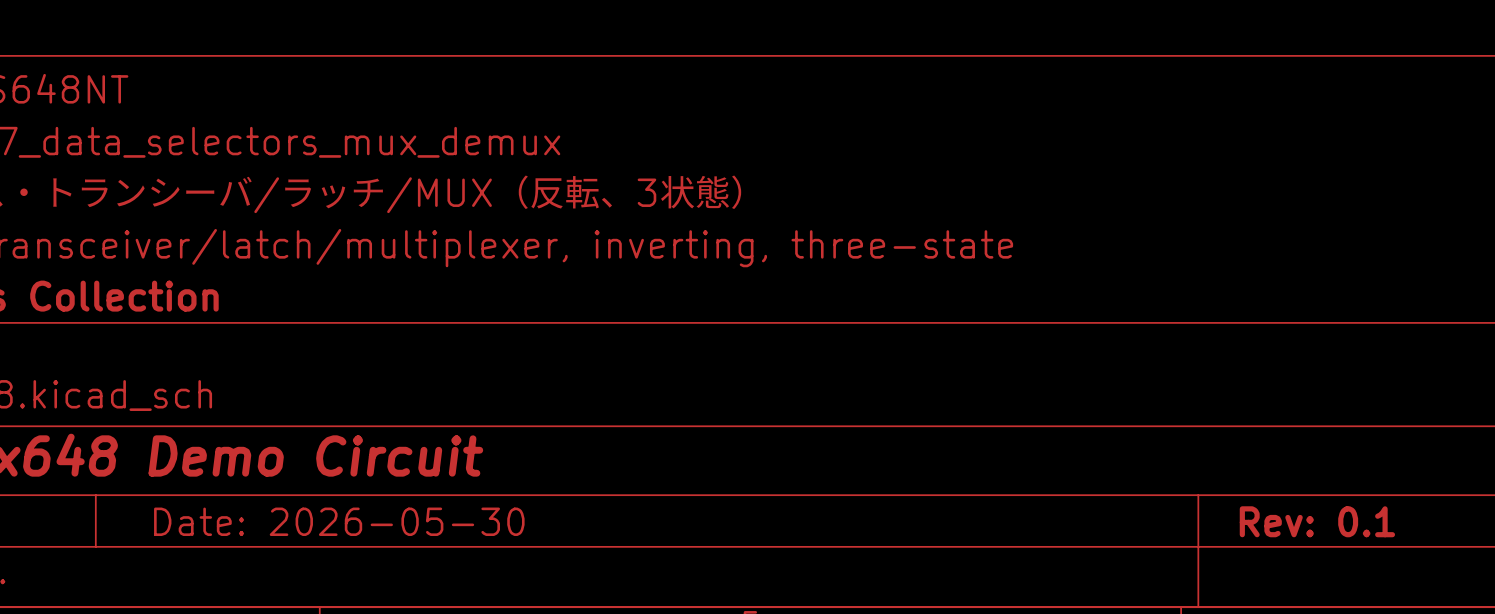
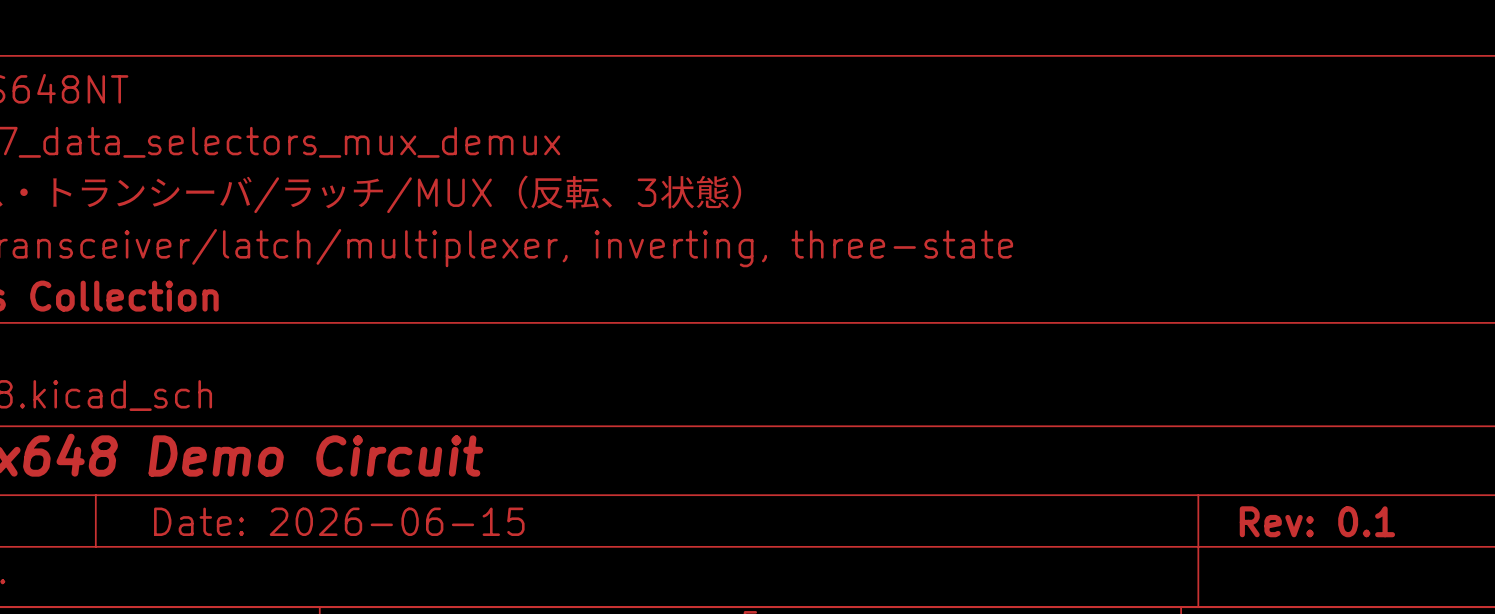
title block: Date: 2026-05-30 (339, 521) -> Date: 2026-06-15 (339, 521)

